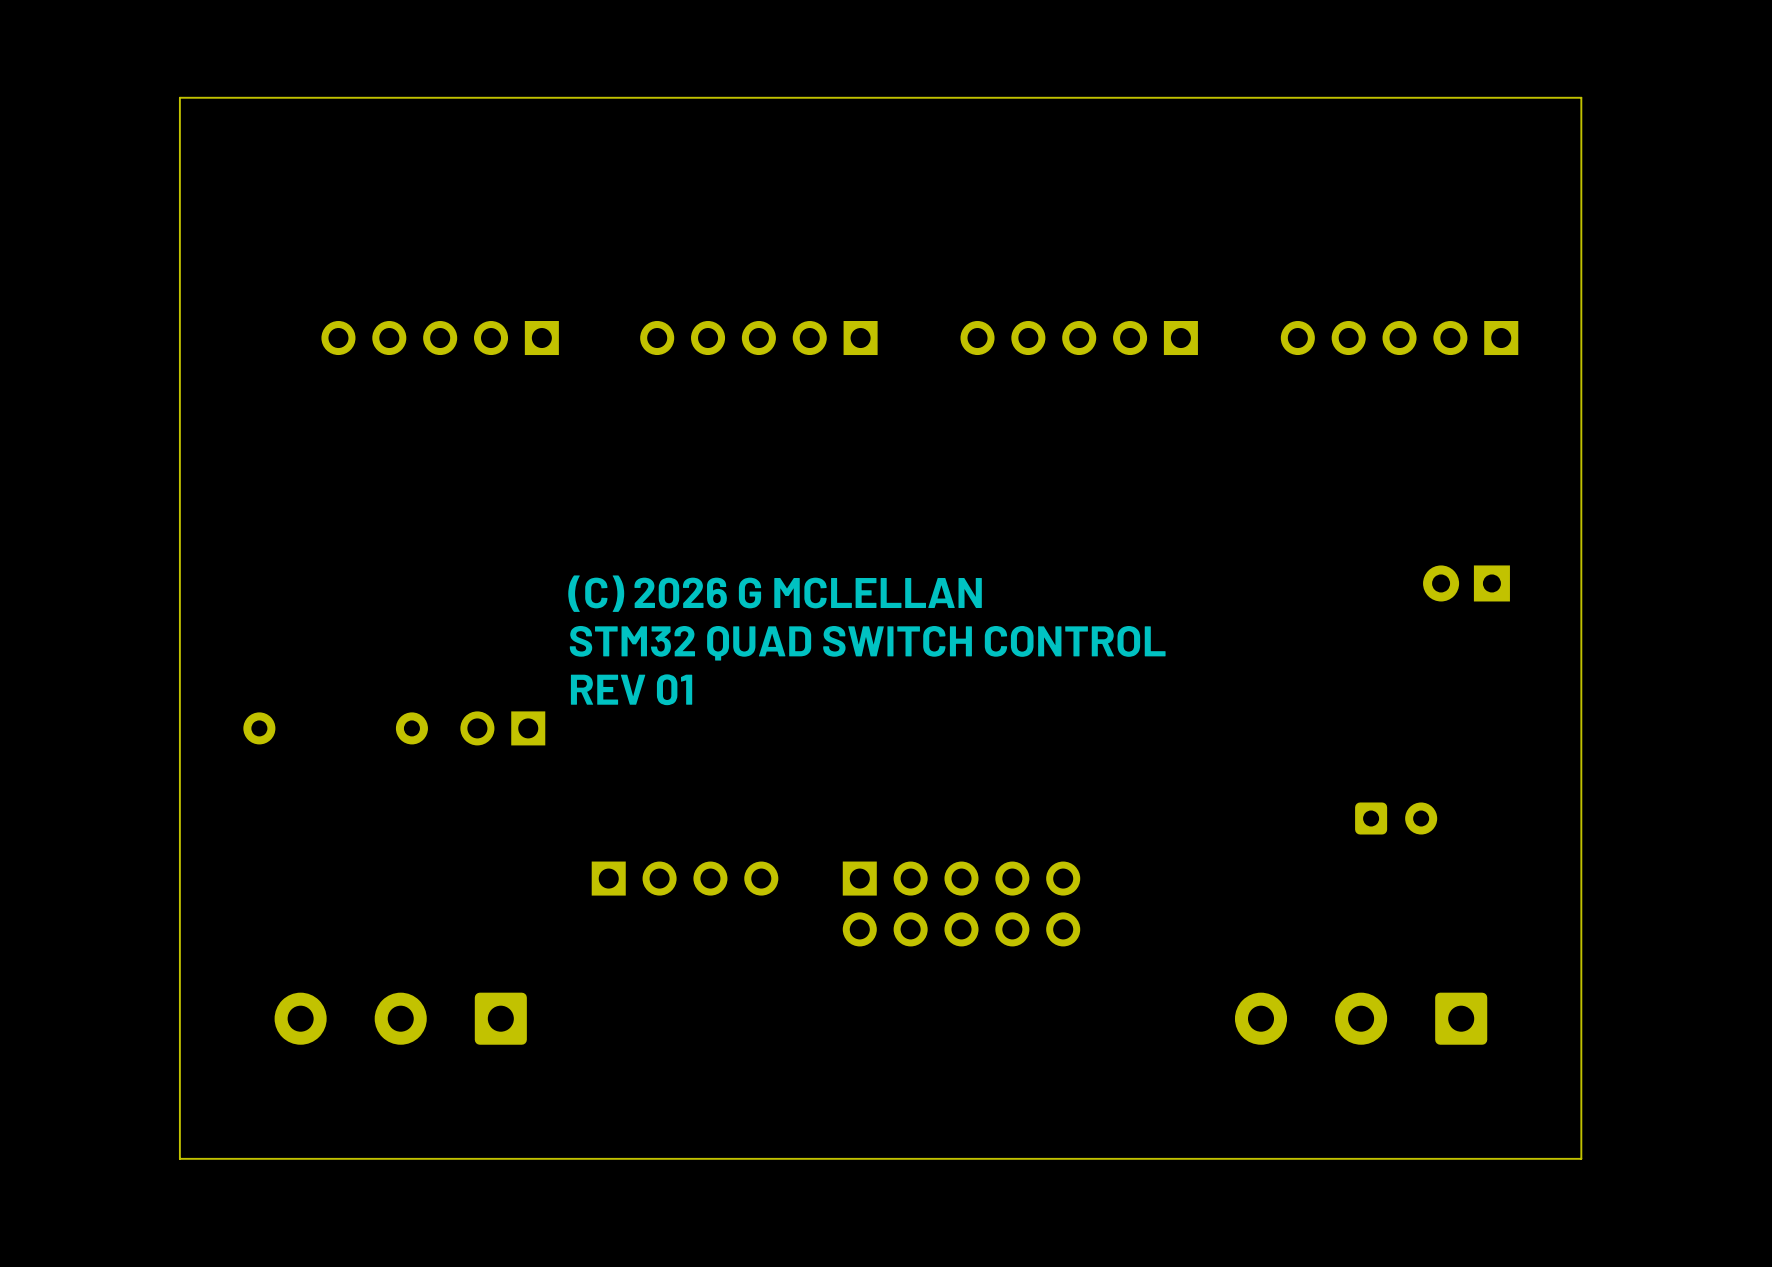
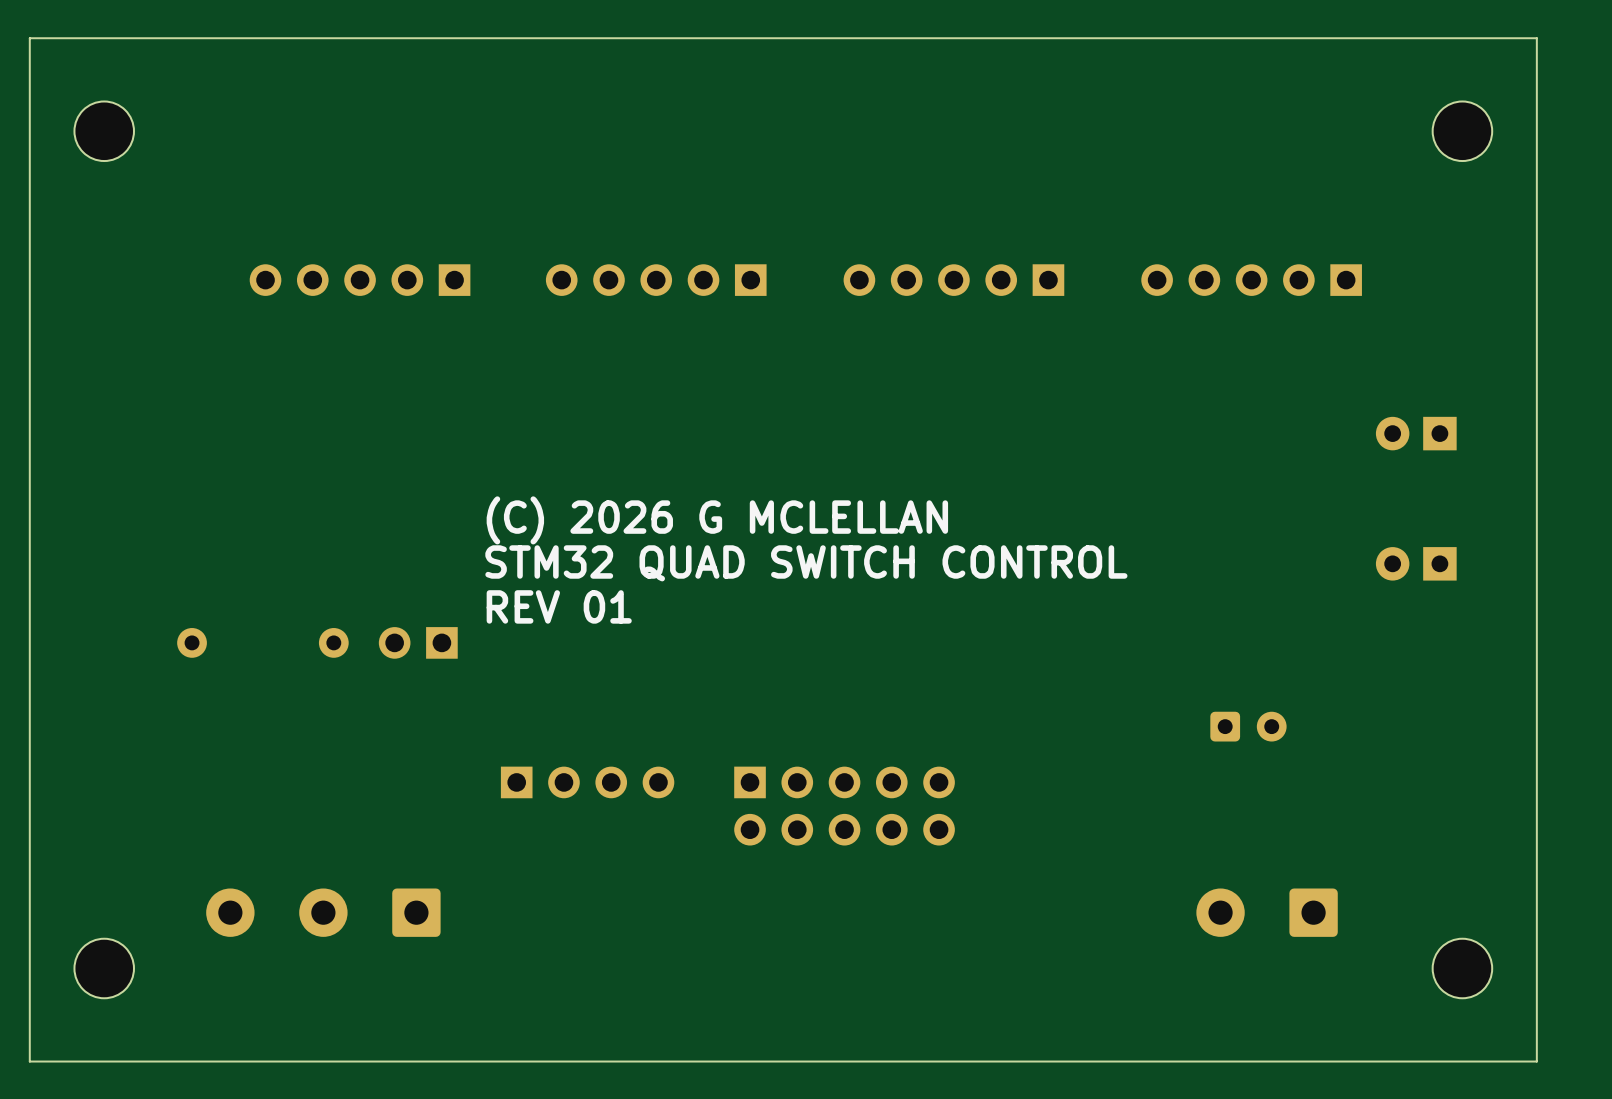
board edge: (1581, 97) (179, 97) (179, 1158) (1581, 1158) (1581, 97) -> (1536, 38) (1536, 1061) (29, 1061) (29, 38) (1536, 38)
part: none -> (104, 131)
part: none -> (1462, 131)
part: none -> (1416, 433)
part: (1466, 583) -> none
part: none -> (1416, 563)
part: (1361, 1018) -> none
part: none -> (1267, 912)
part: none -> (104, 968)
part: none -> (1462, 968)

